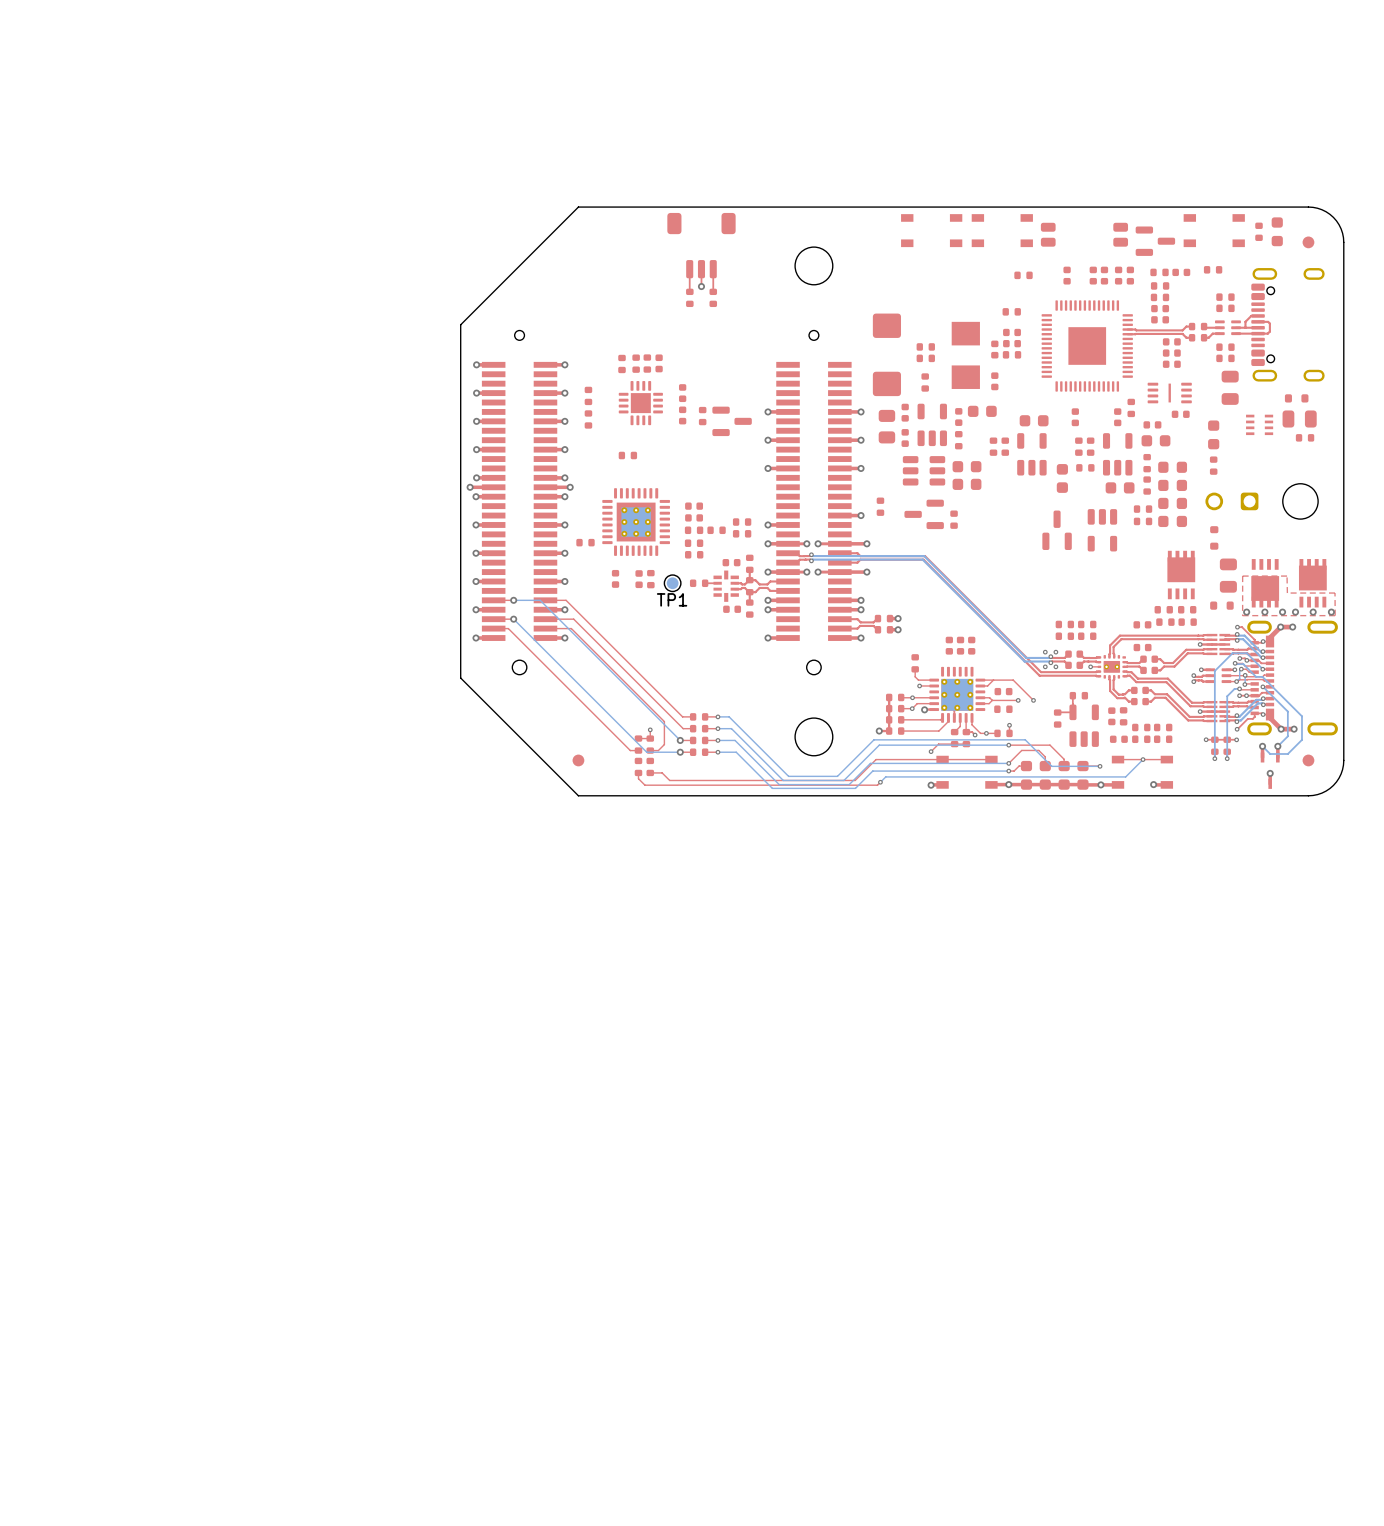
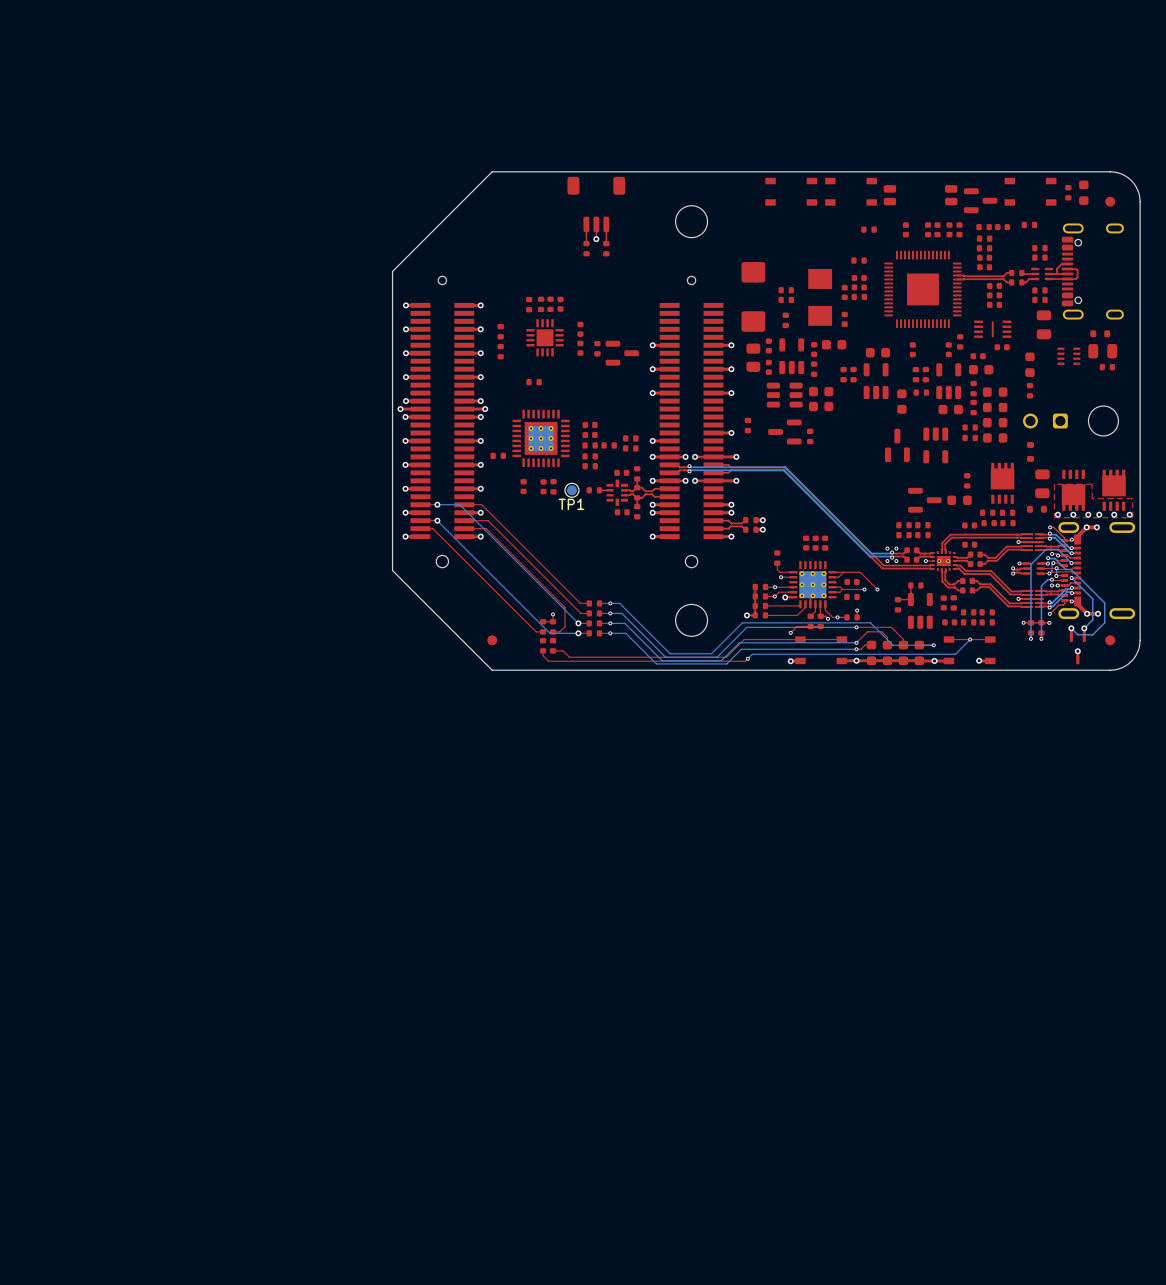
part: none -> (967, 480)
part: none -> (924, 500)
part: none -> (959, 500)

